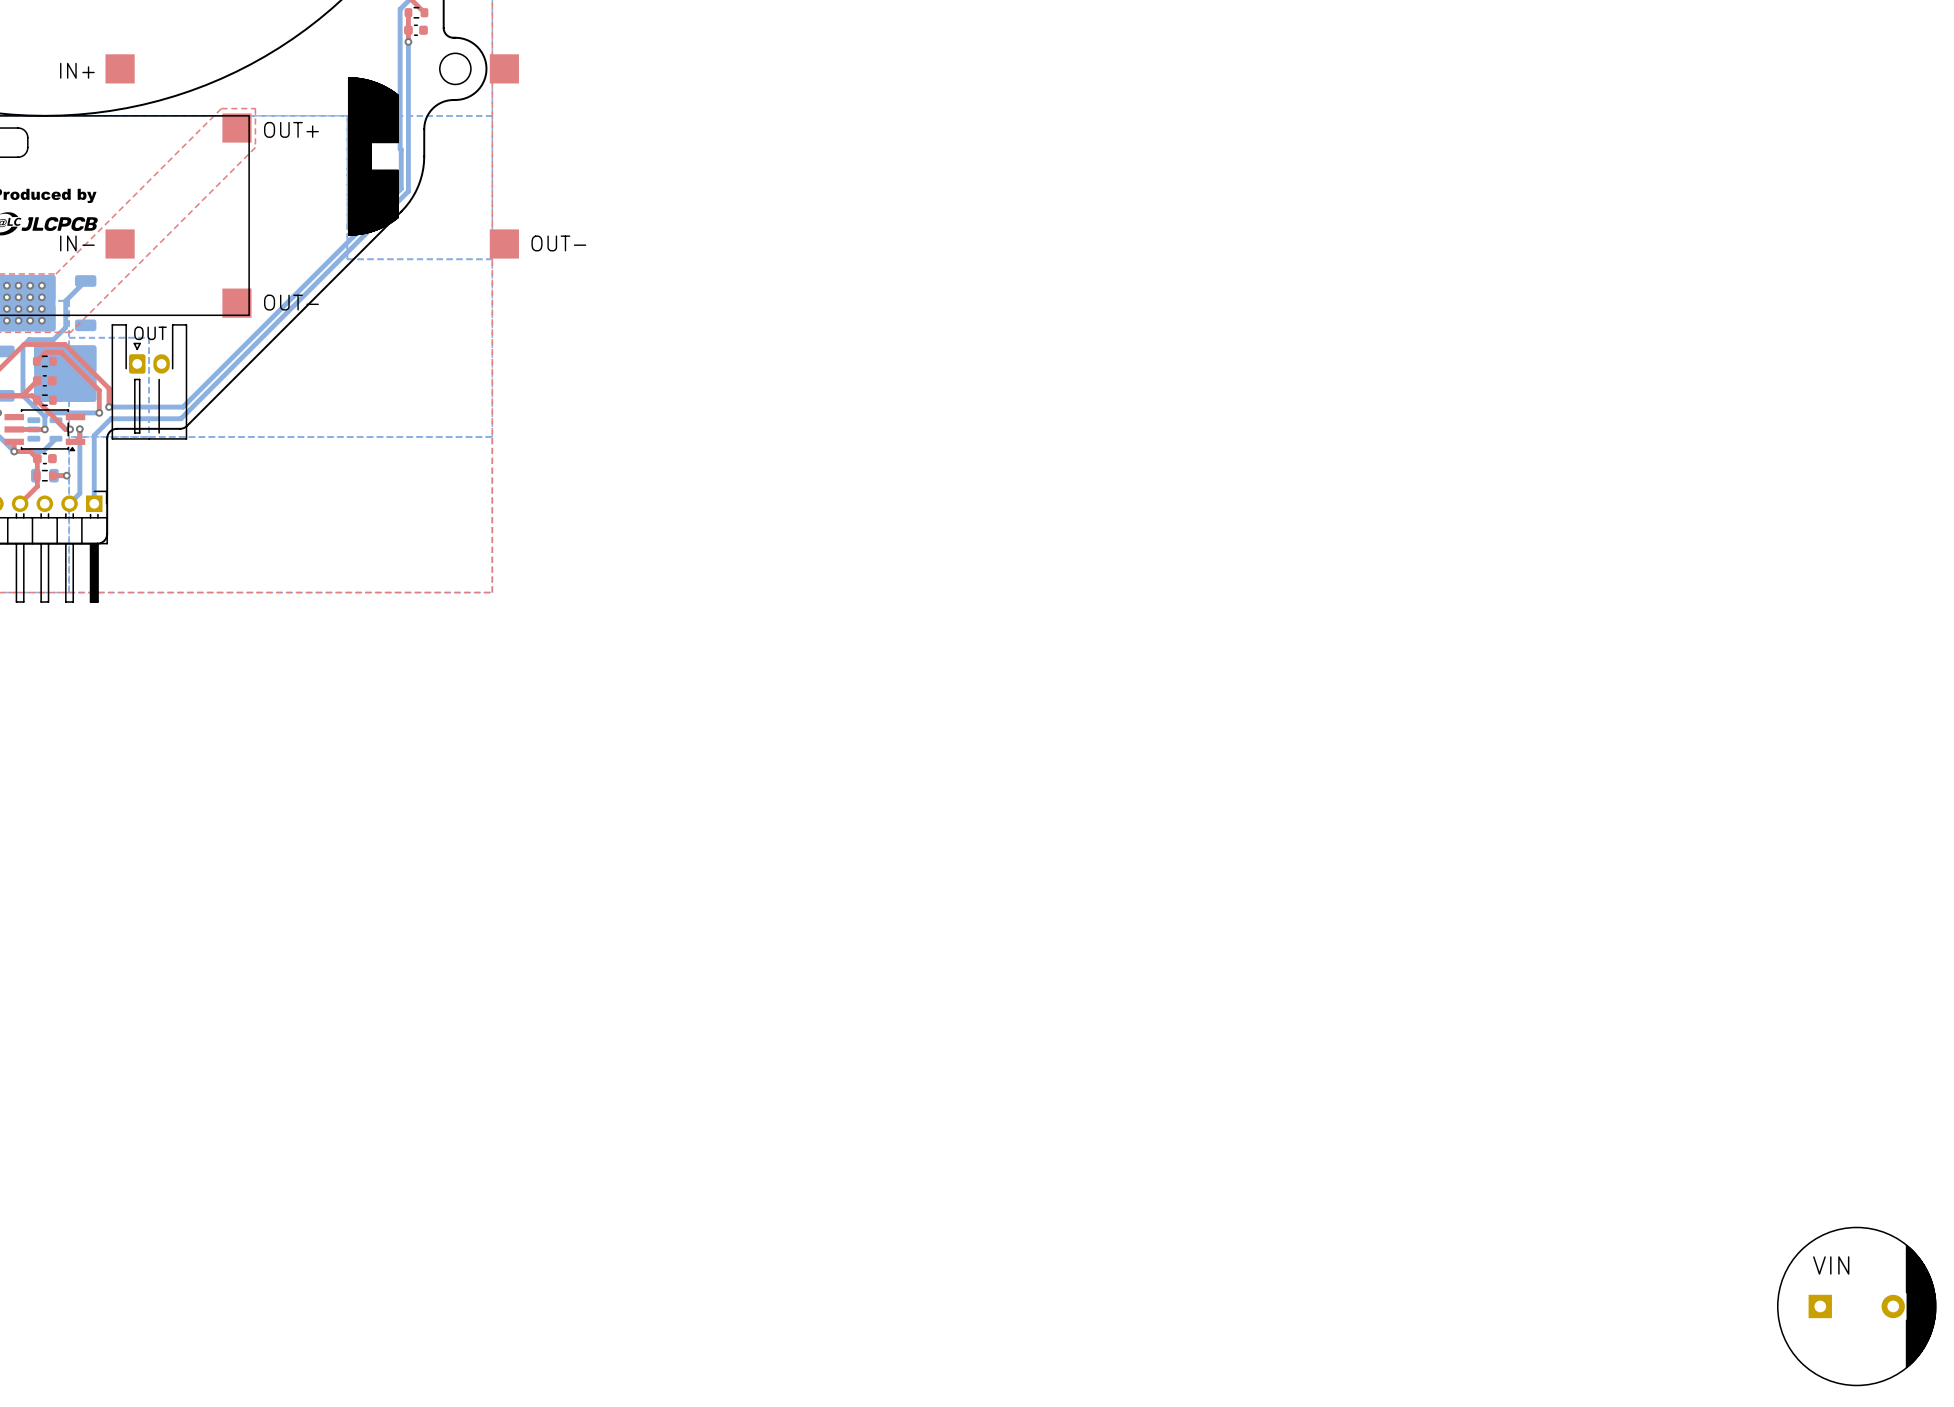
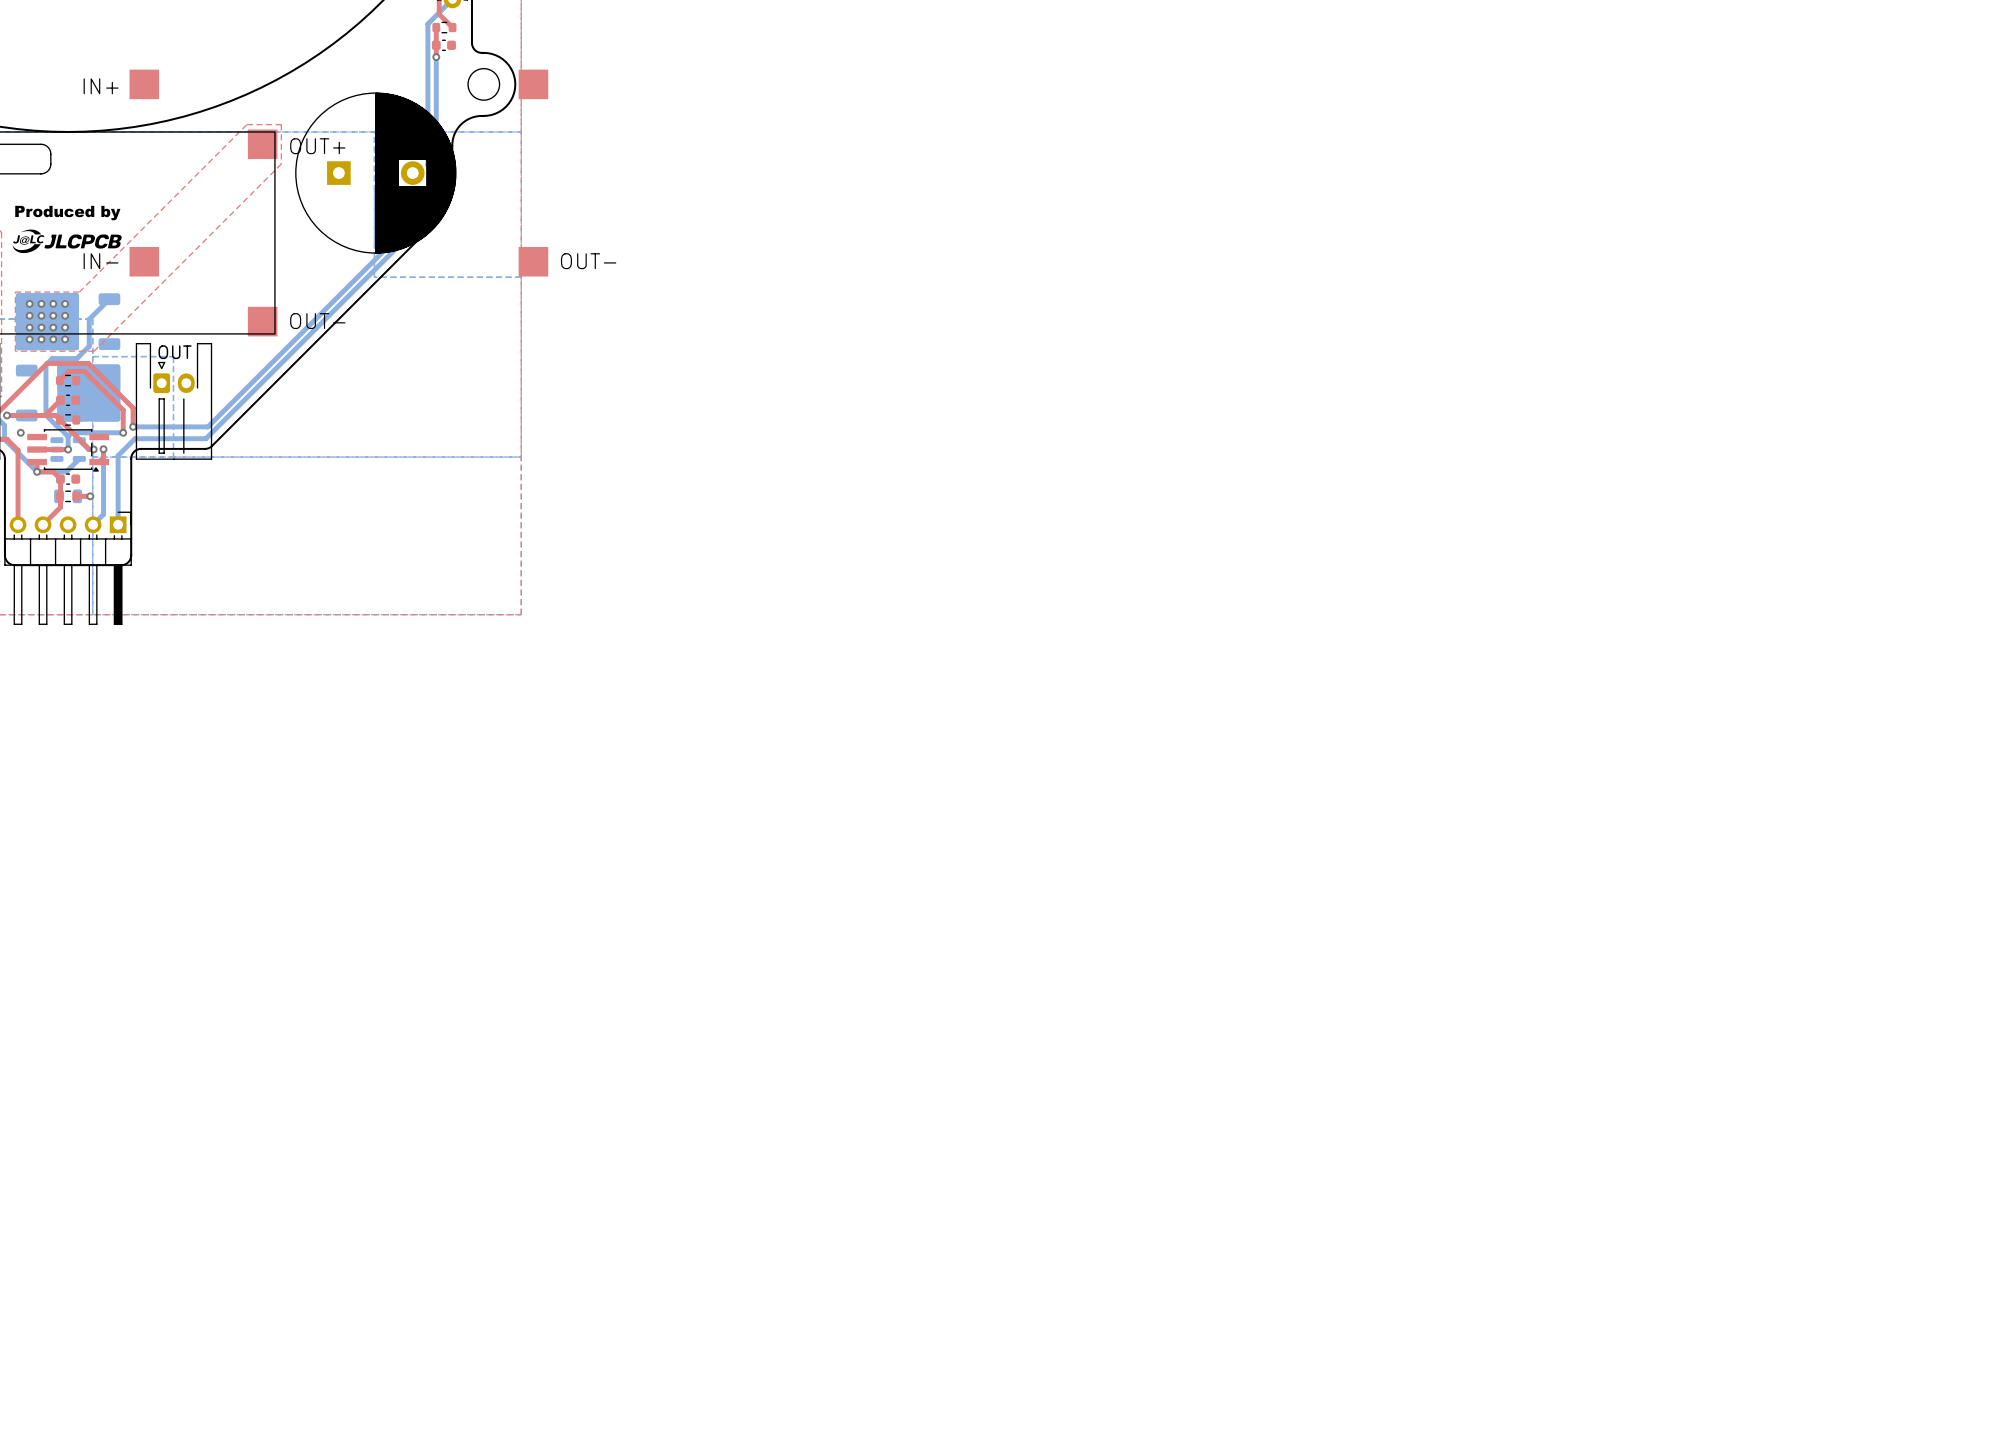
part: none -> (375, 173)
VIN: (1856, 1306) -> none

